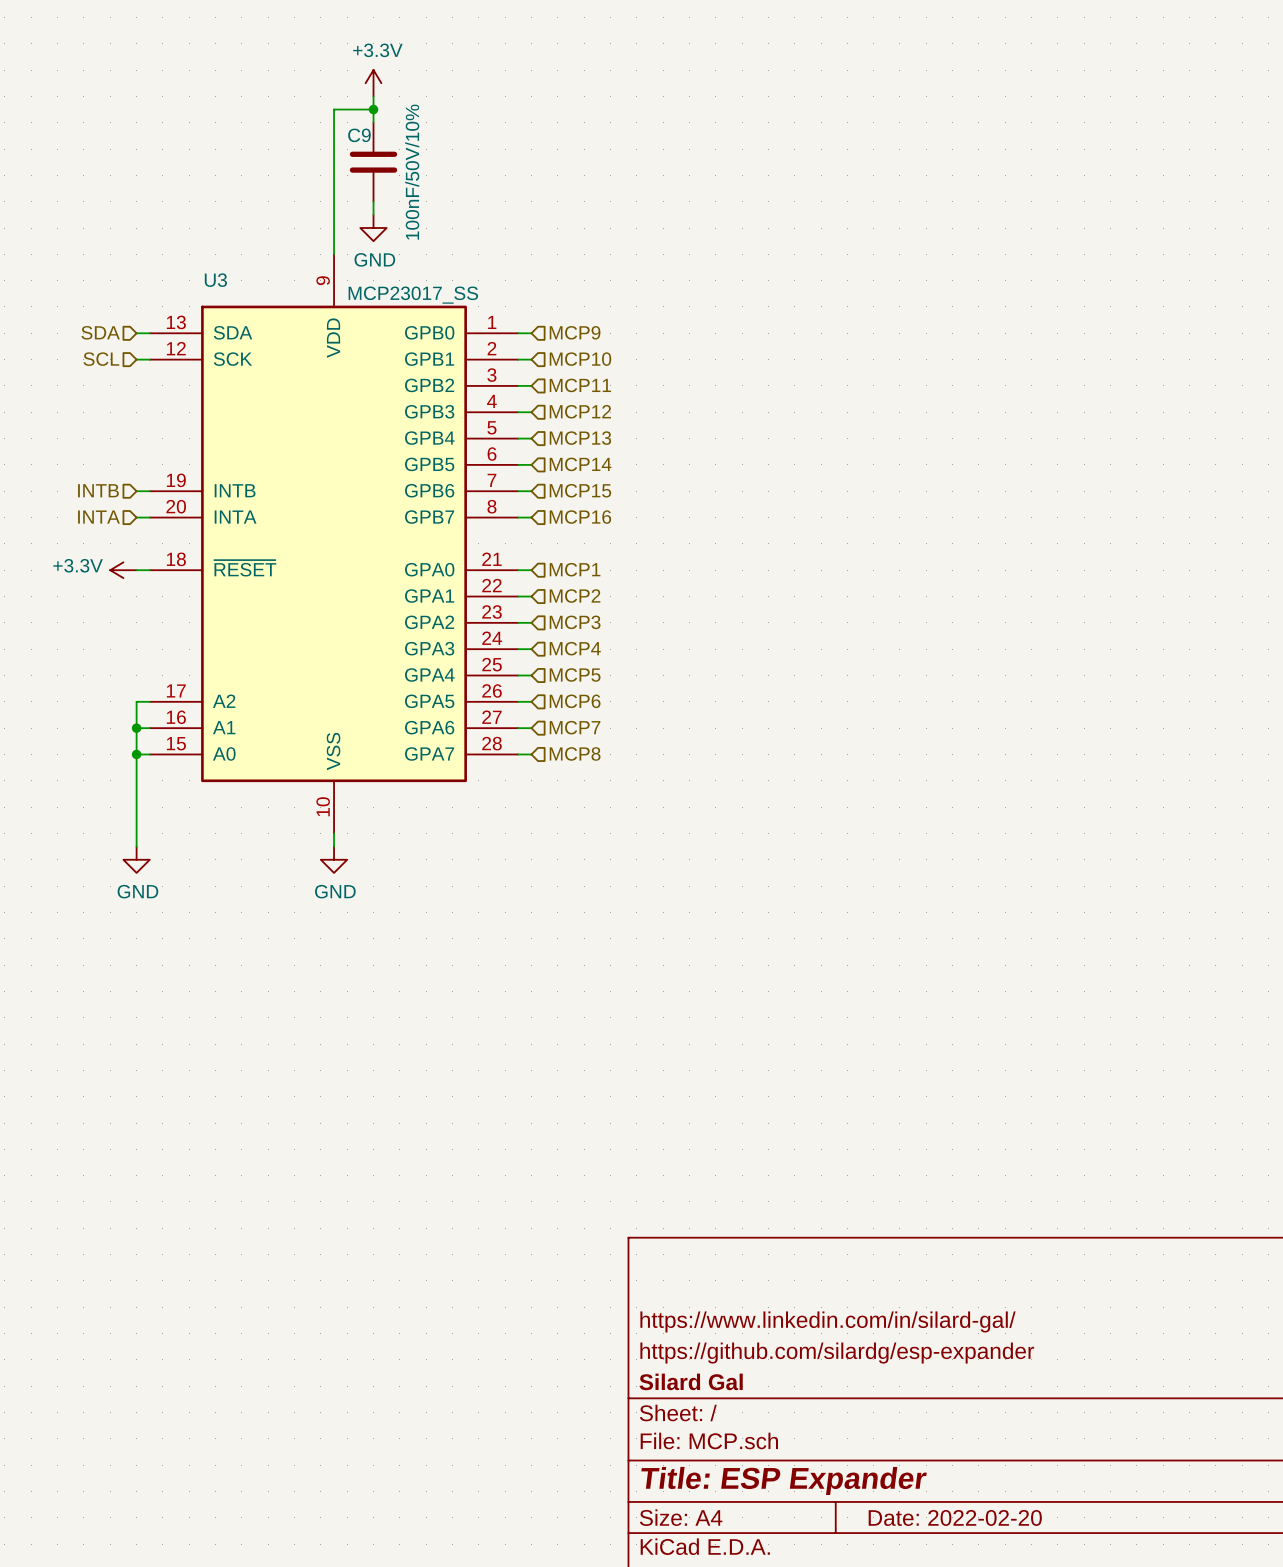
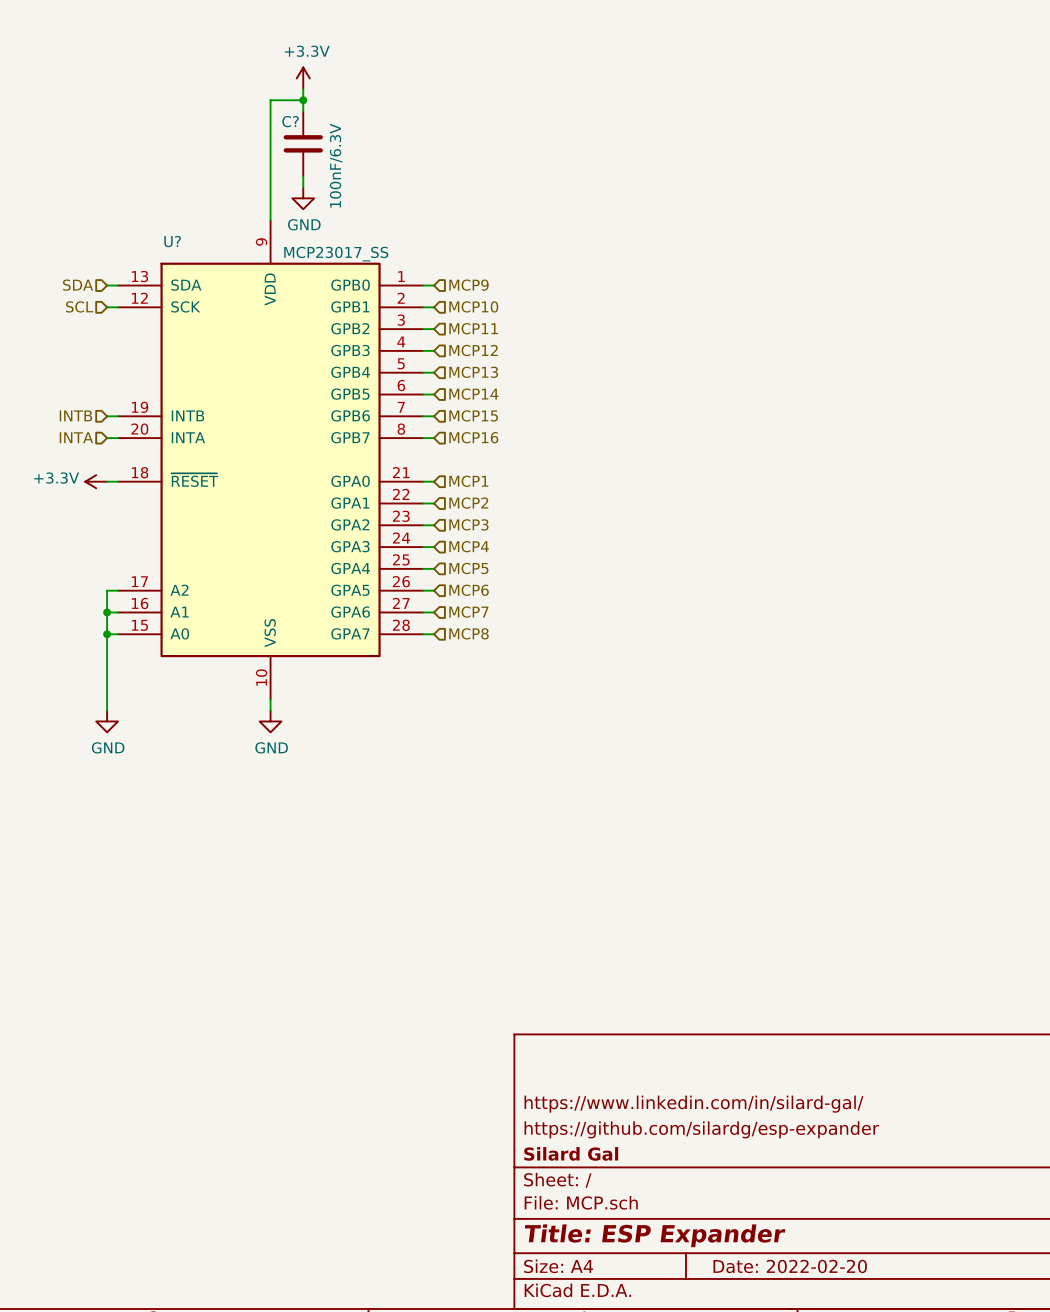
C9 name: C9 (359, 135) -> C? (290, 121)
C9 value: 100nF/50V/10% (412, 172) -> 100nF/6.3V (336, 165)
U3 name: U3 (215, 280) -> U? (172, 241)

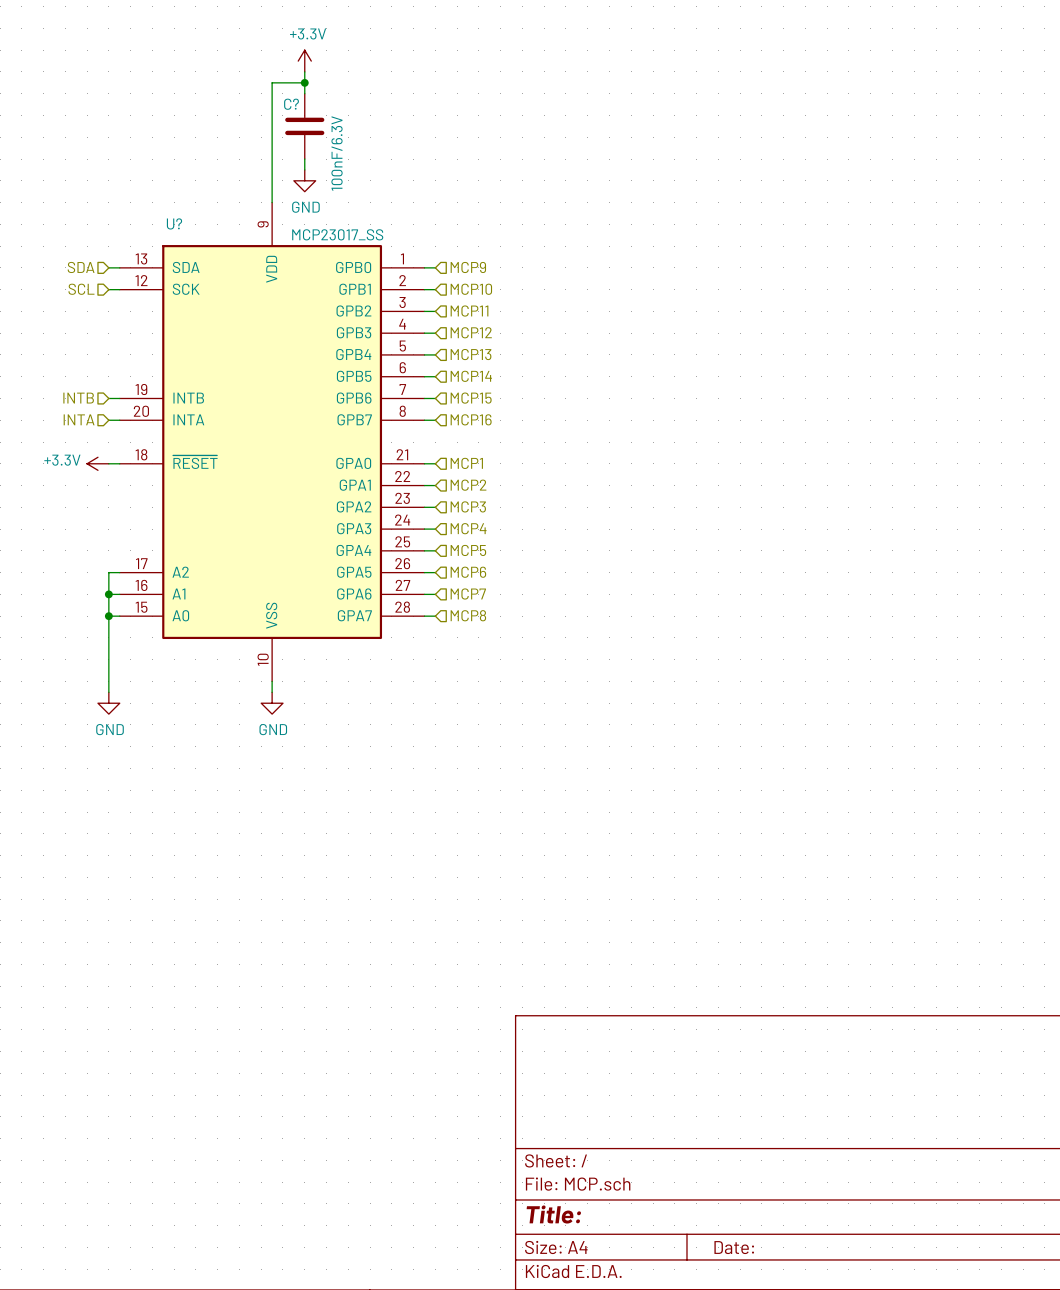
title block: https://www.linkedin.com/in/silard-gal/ (693, 1104) -> none
title block: https://github.com/silardg/esp-expander (701, 1129) -> none
title block: Silard Gal (571, 1153) -> none
title block: Title: ESP Expander (655, 1235) -> Title: (553, 1214)
title block: Date: 2022-02-20 (790, 1266) -> Date: (734, 1247)

